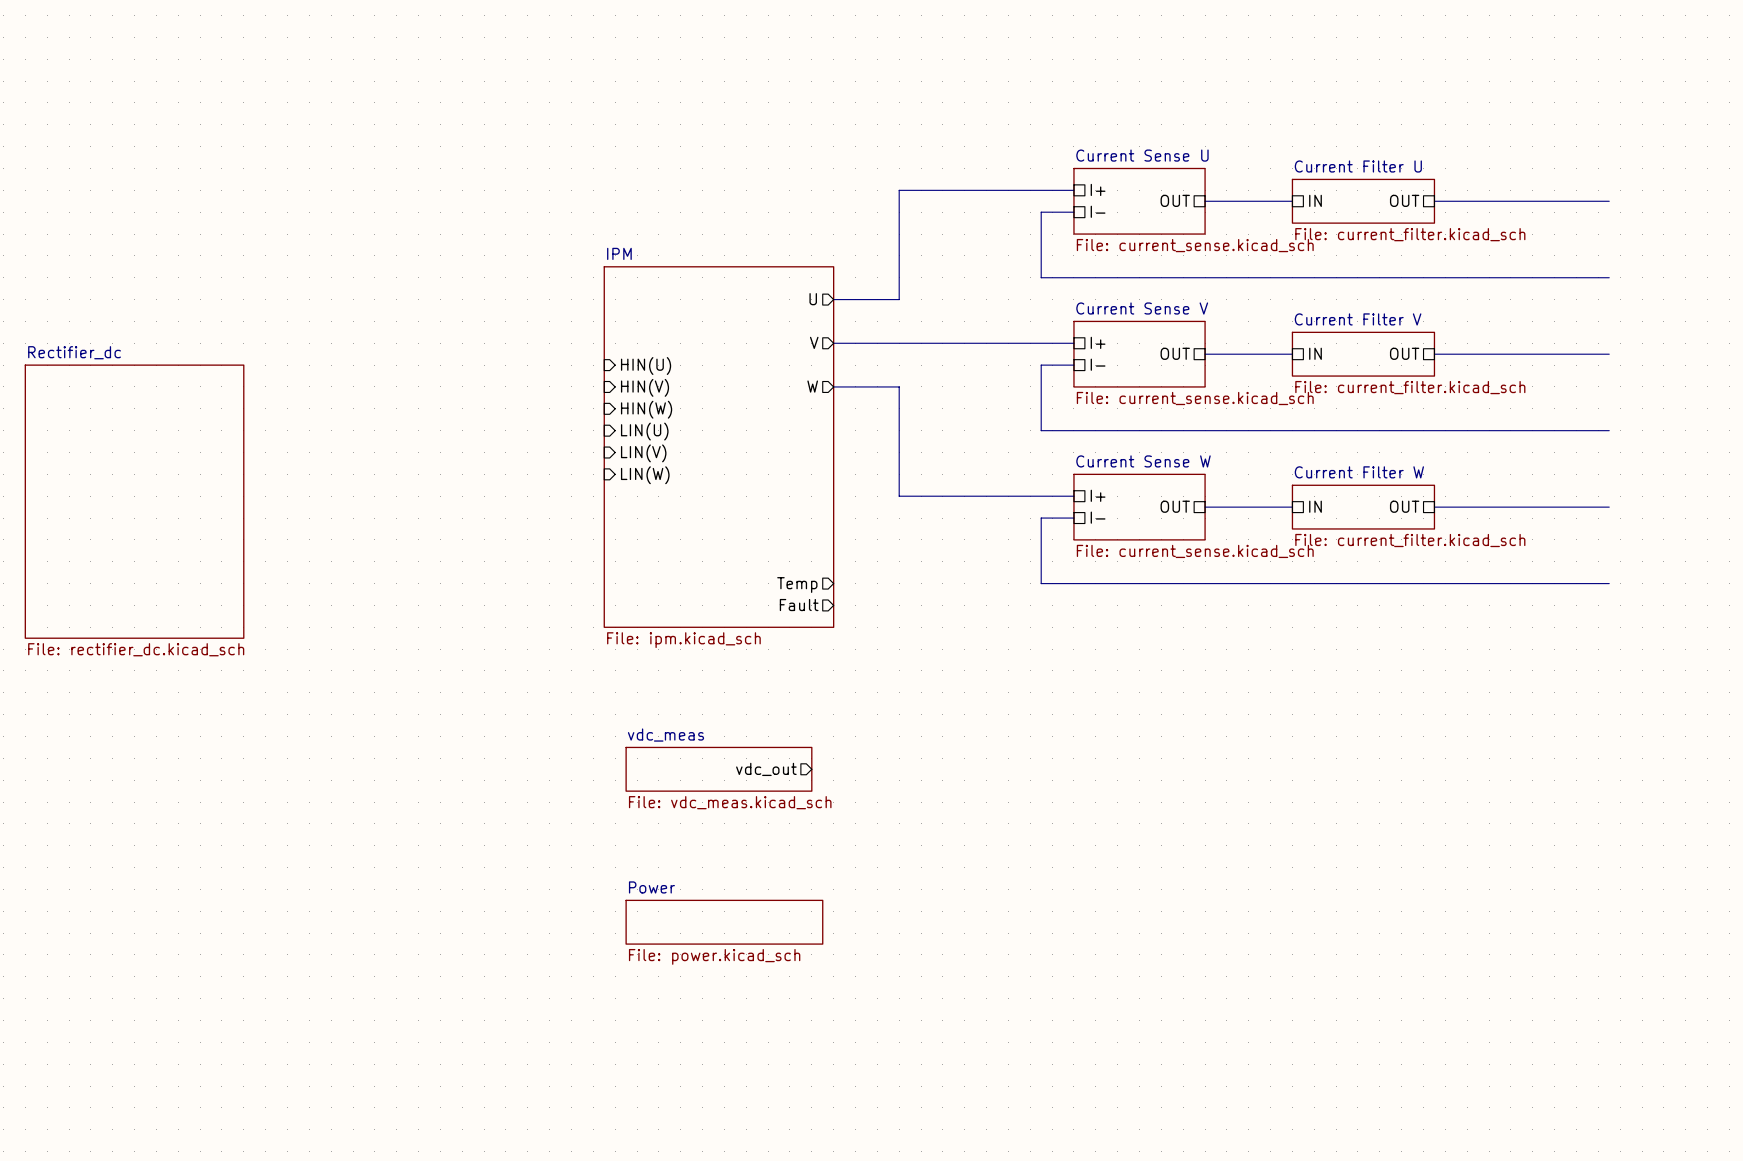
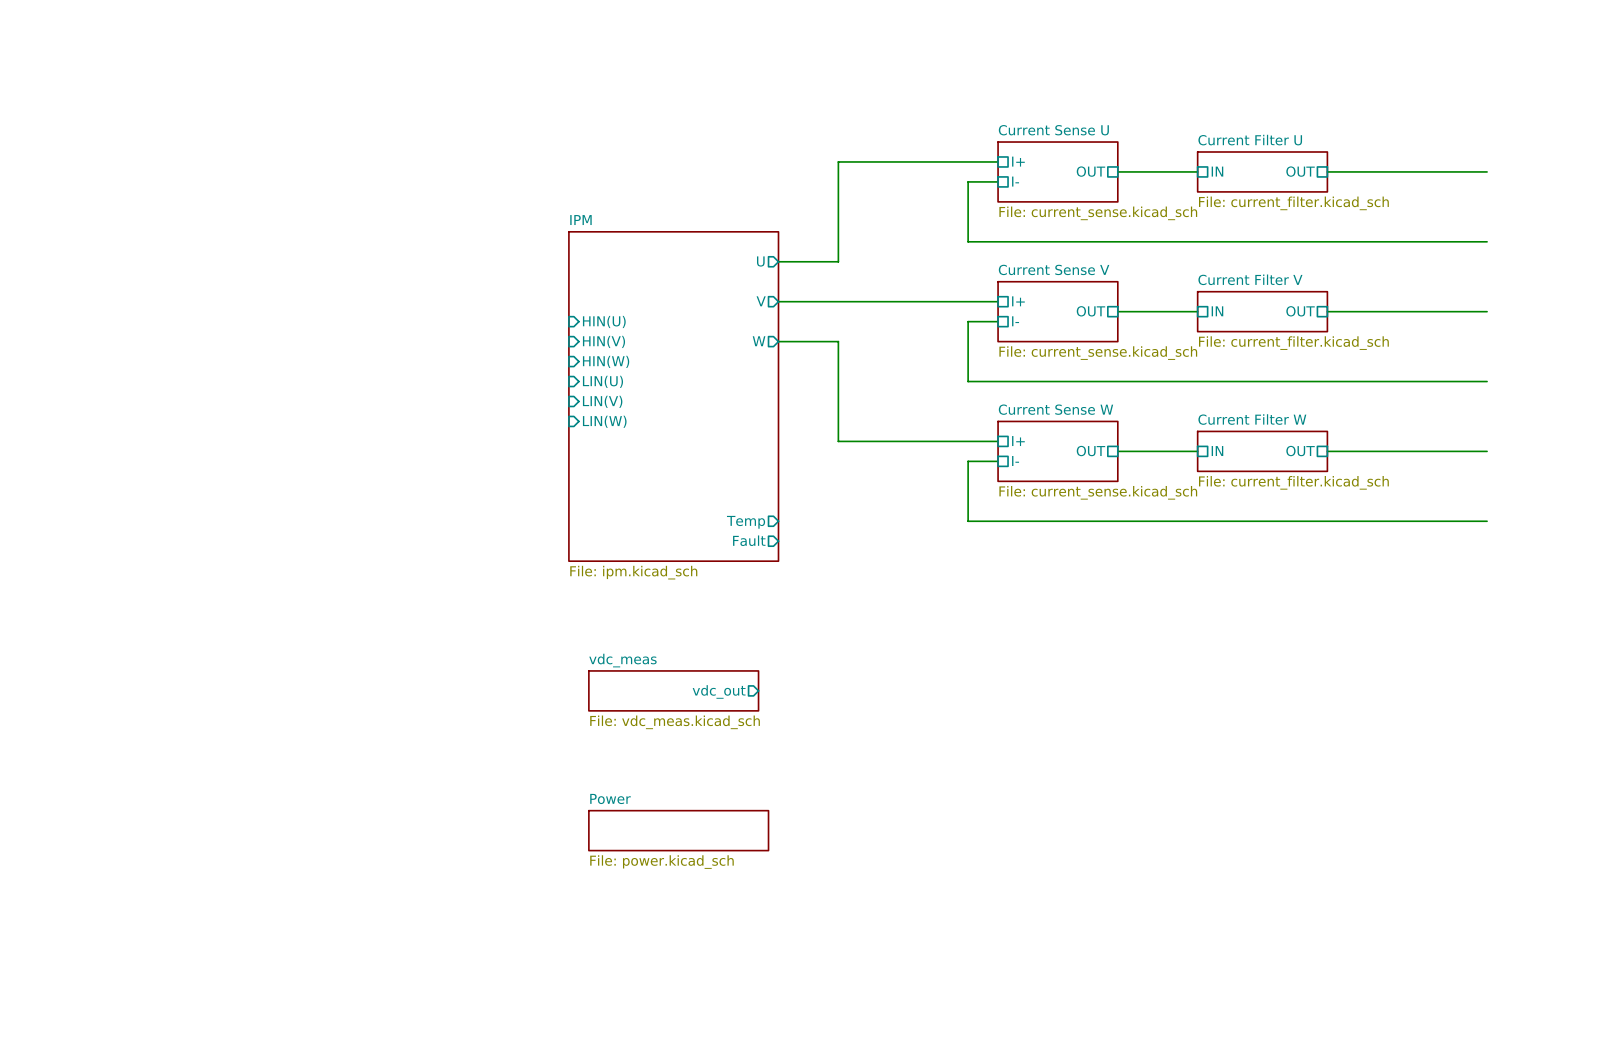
sheet Rectifier_dc: File: rectifier_dc.kicad_sch (134, 501) -> none

